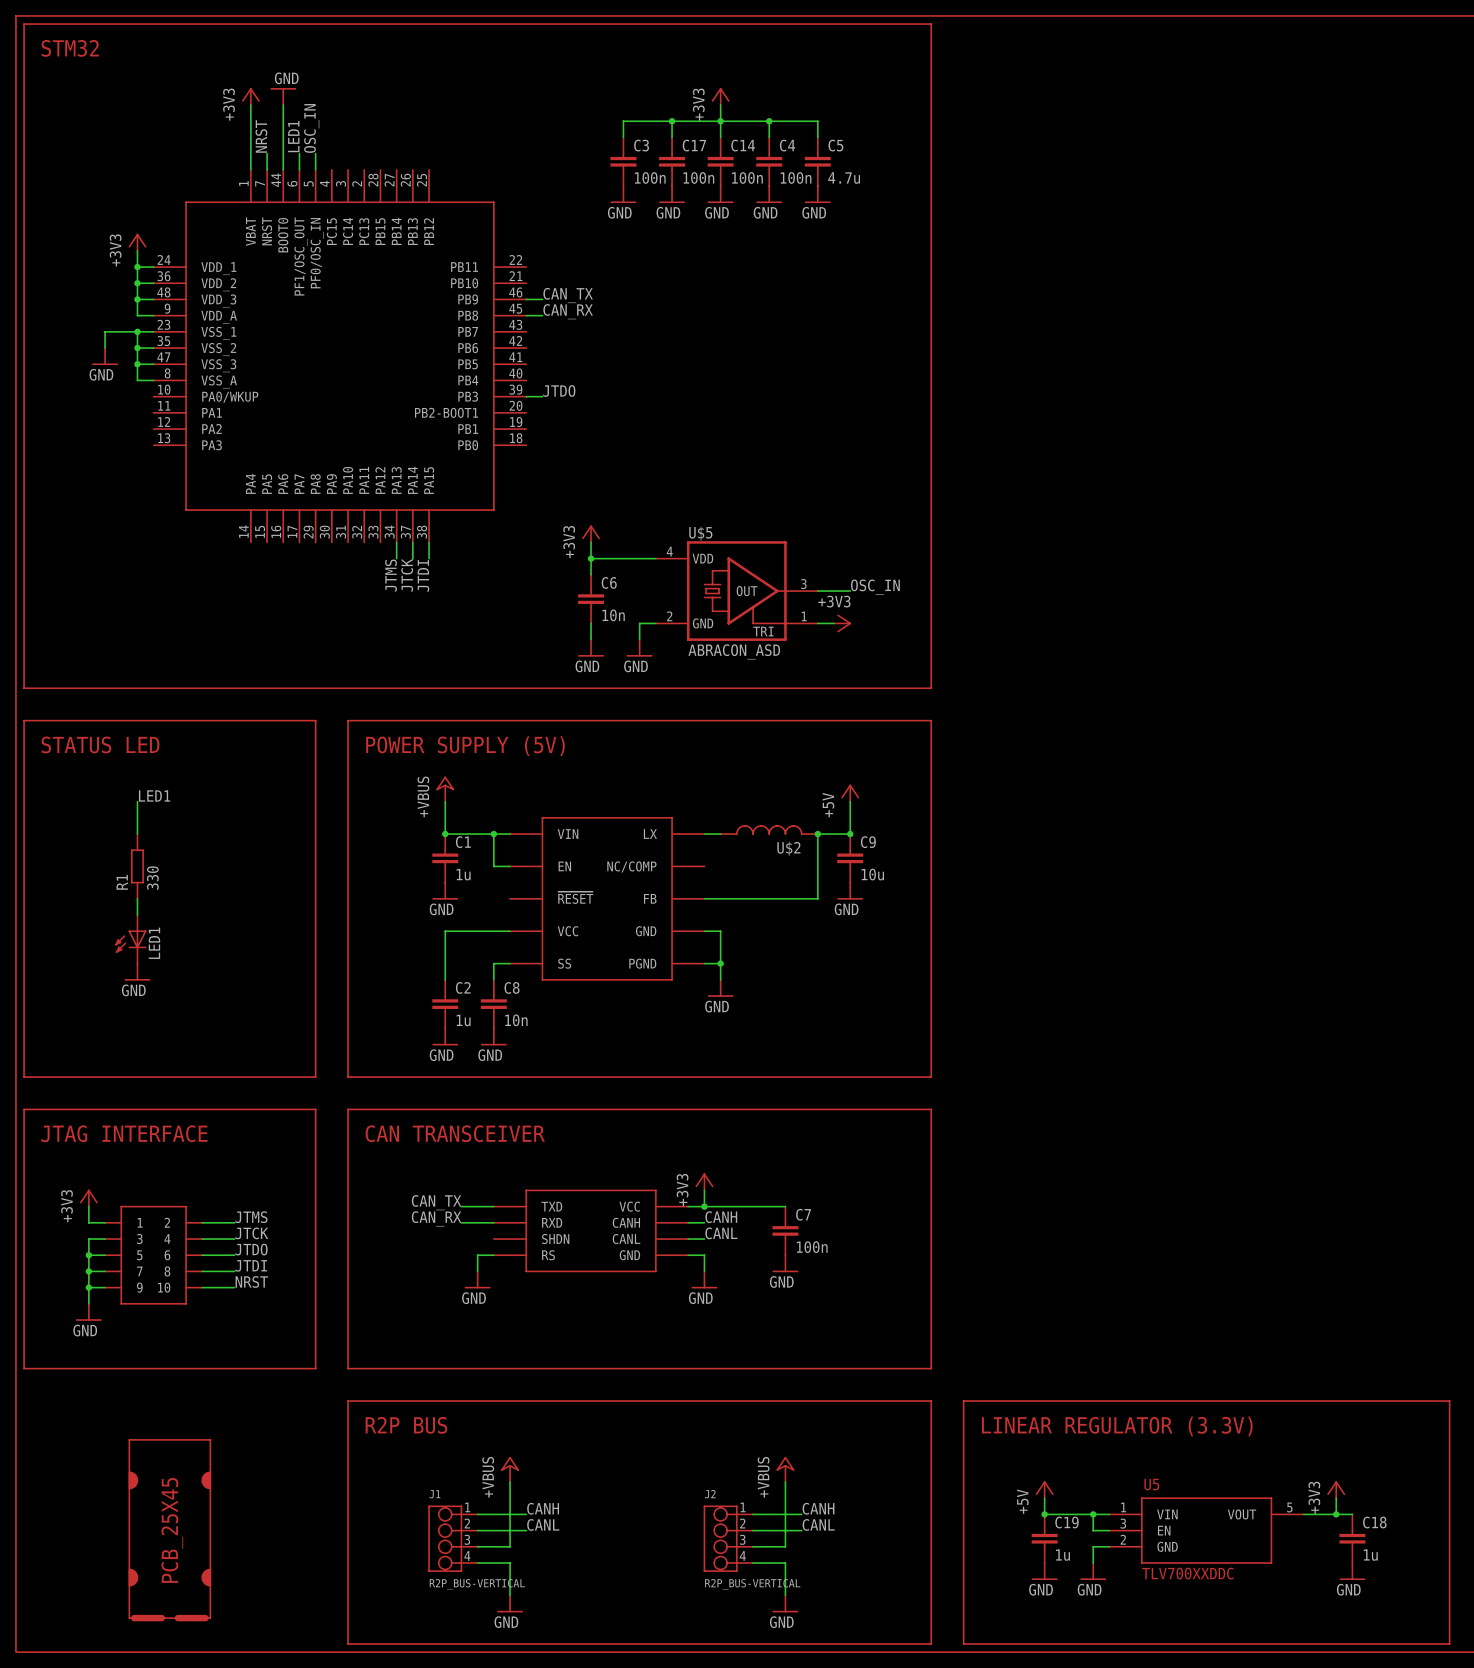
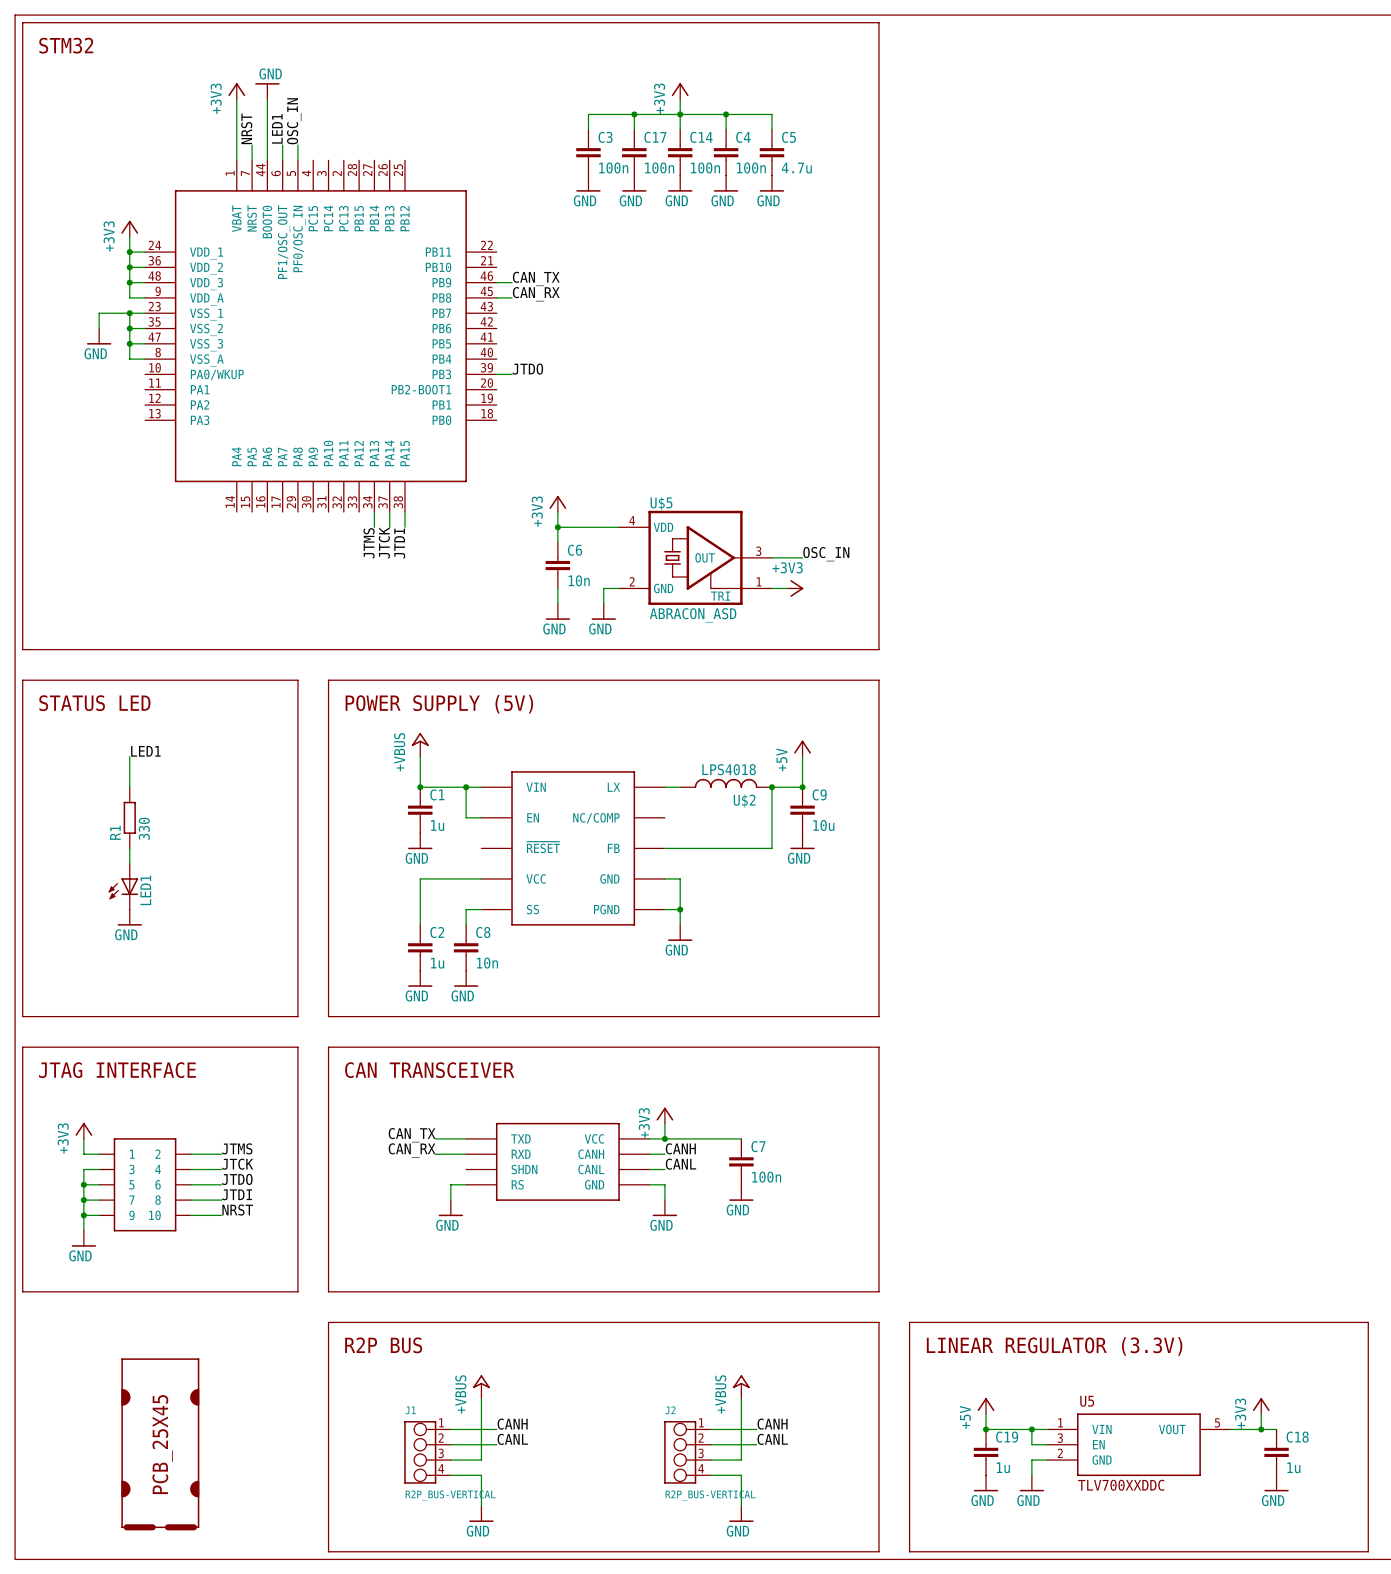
U$2 value: none -> LPS4018 (729, 769)

